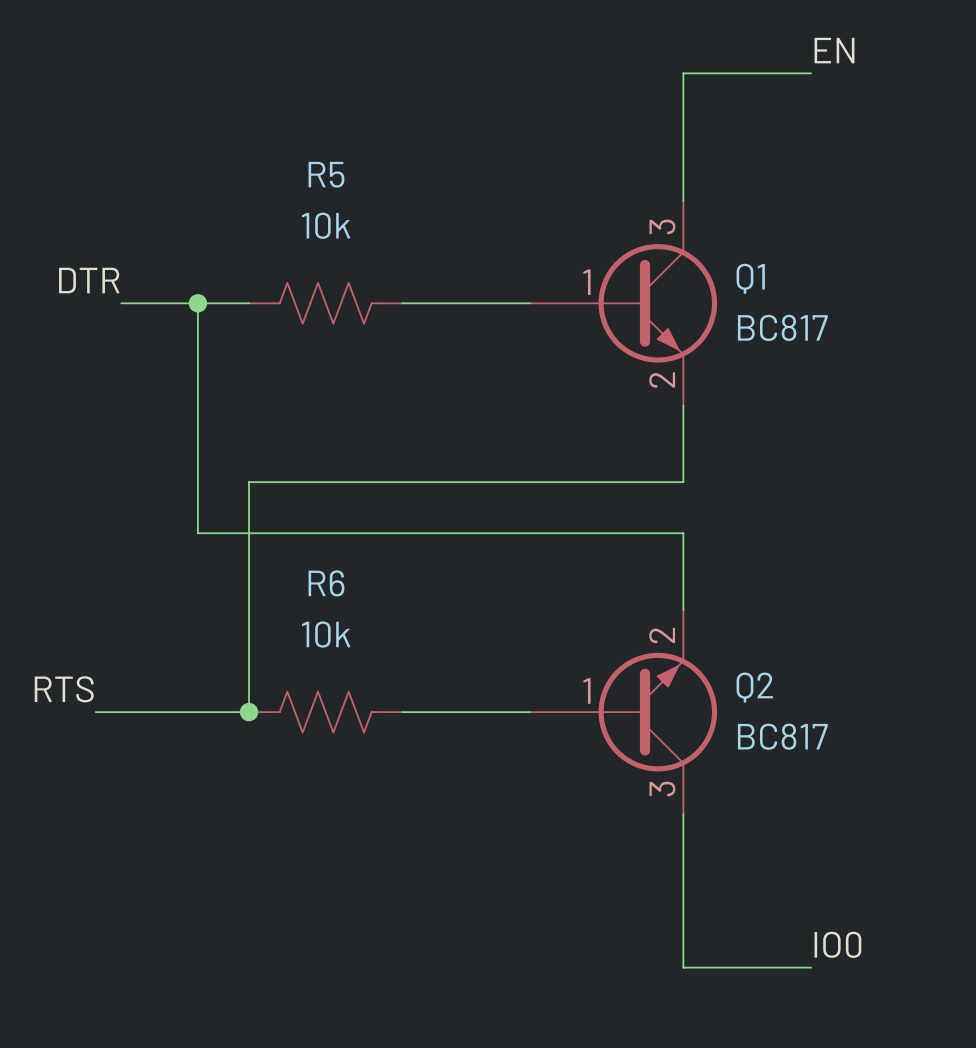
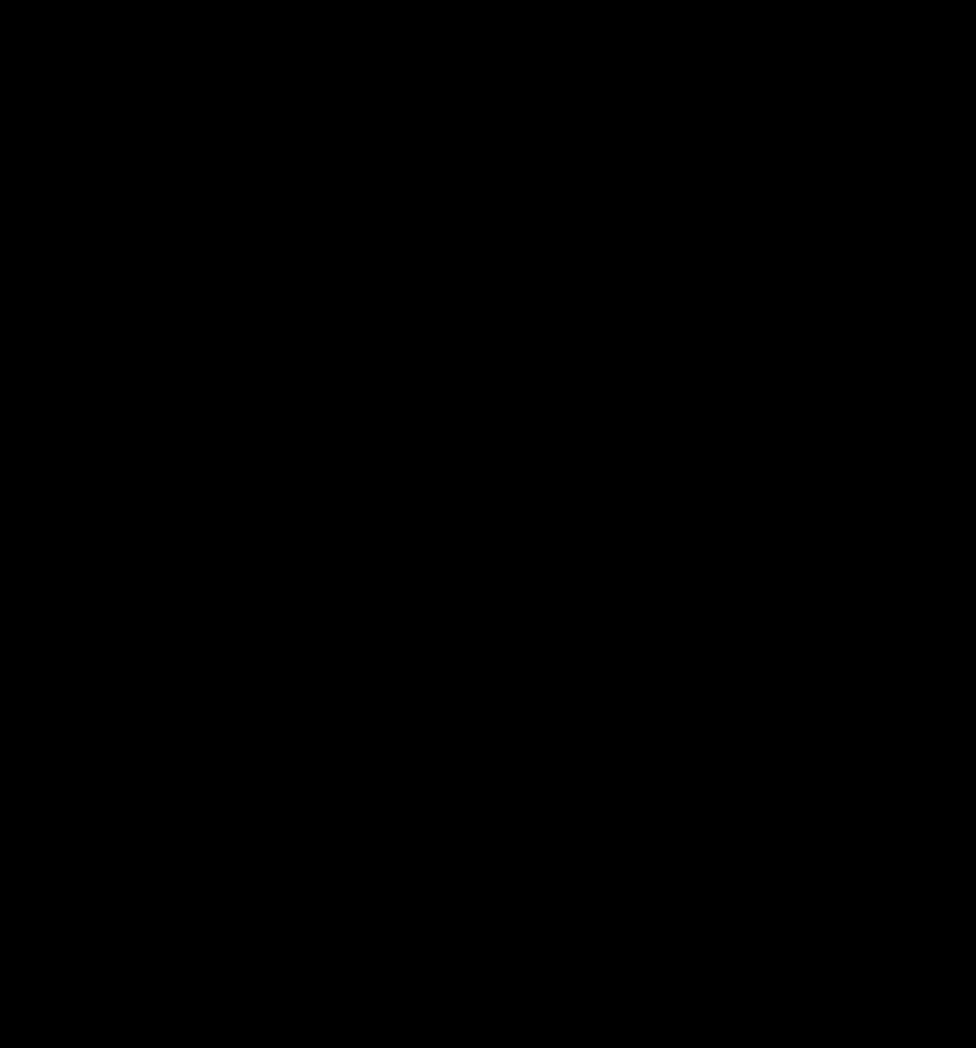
label: EN (834, 50) -> none
wire: (811, 73) (683, 73) (683, 201) -> none
label: DTR (89, 280) -> none
wire: (121, 303) (249, 303) -> none
wire: (197, 303) (197, 533) (683, 533) (683, 609) -> none
junction: (197, 303) -> none
R5: 10k (325, 303) -> none
wire: (402, 303) (530, 303) -> none
Q1: BC817 (623, 303) -> none
wire: (683, 405) (683, 482) (249, 482) (249, 712) (95, 712) -> none
label: RTS (64, 689) -> none
junction: (249, 712) -> none
R6: 10k (325, 712) -> none
wire: (402, 712) (530, 712) -> none
Q2: BC817 (623, 712) -> none
wire: (683, 814) (683, 967) (811, 967) -> none
label: IO0 (837, 944) -> none

